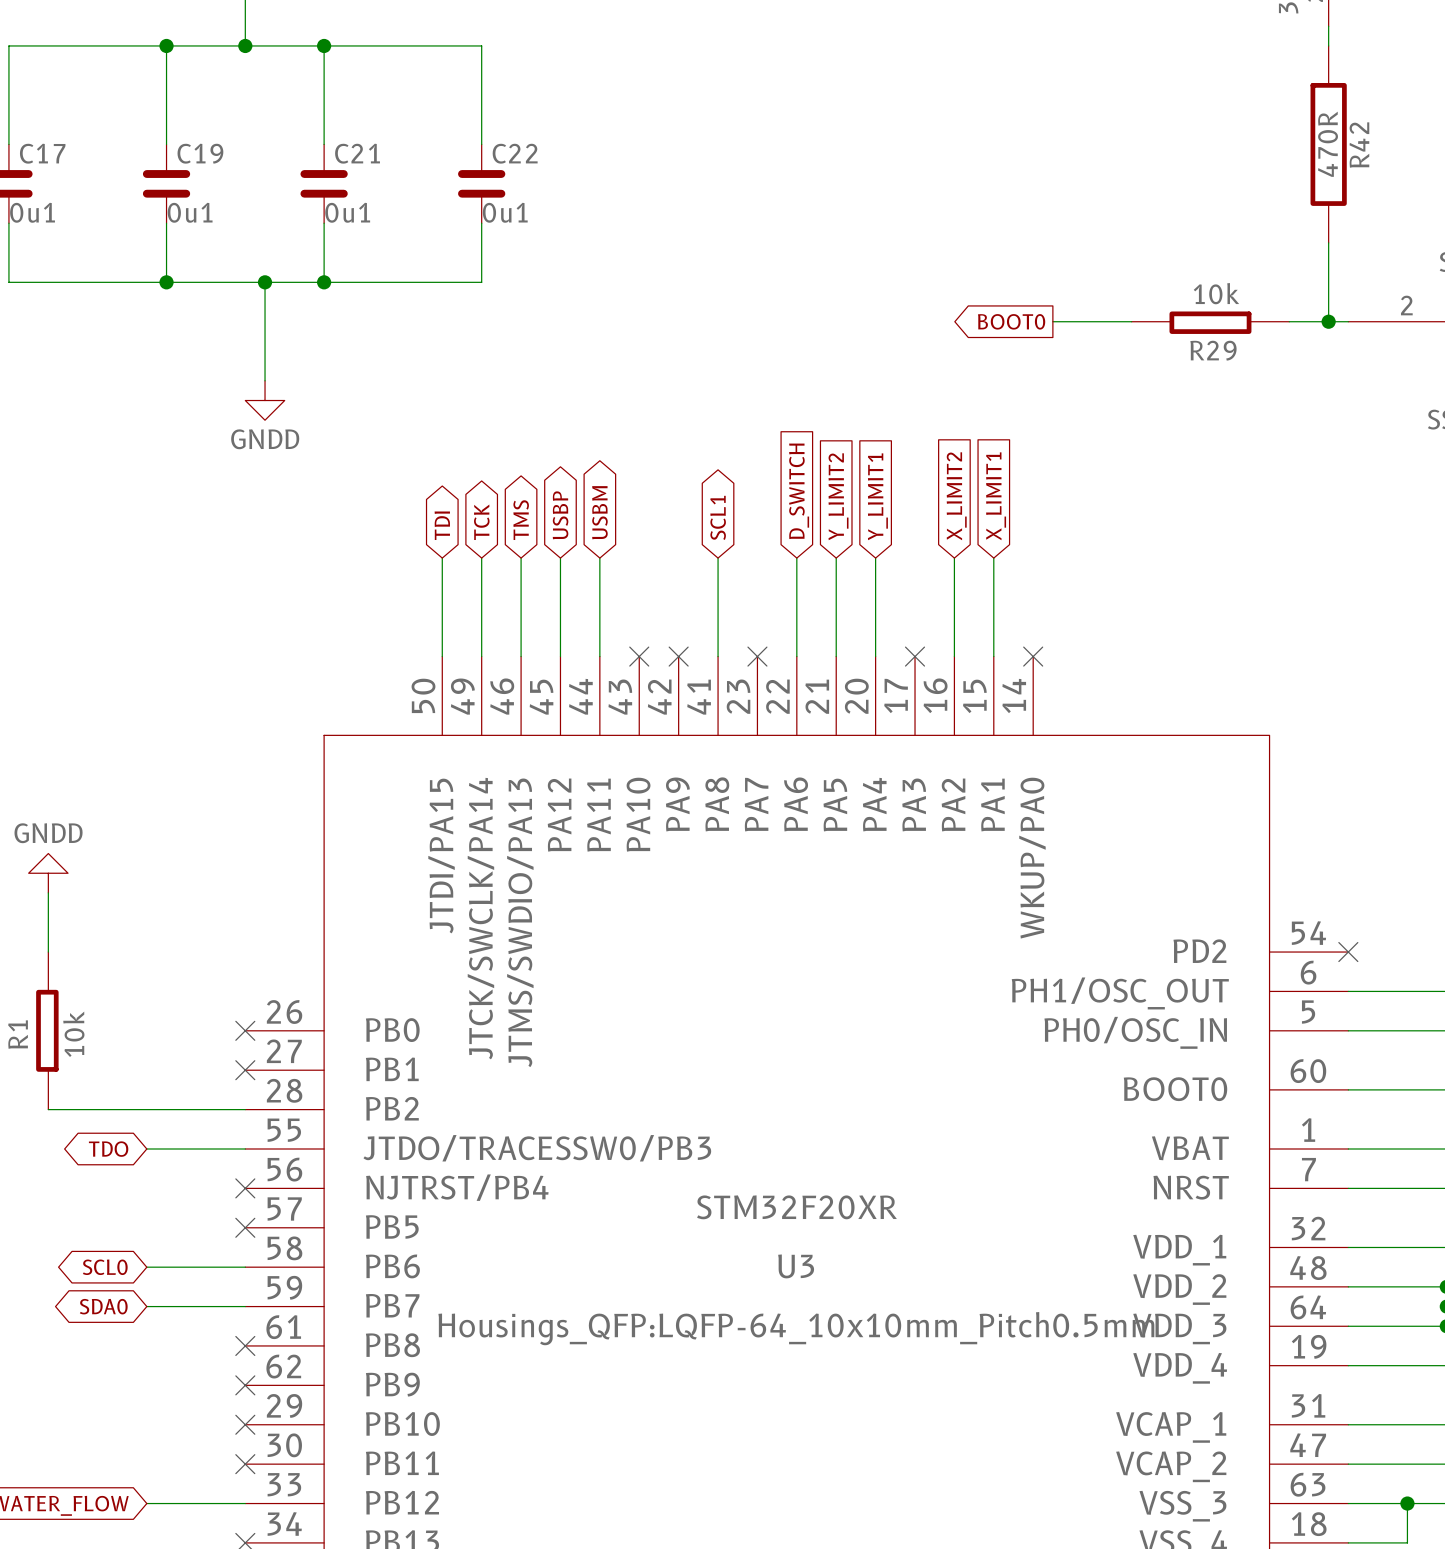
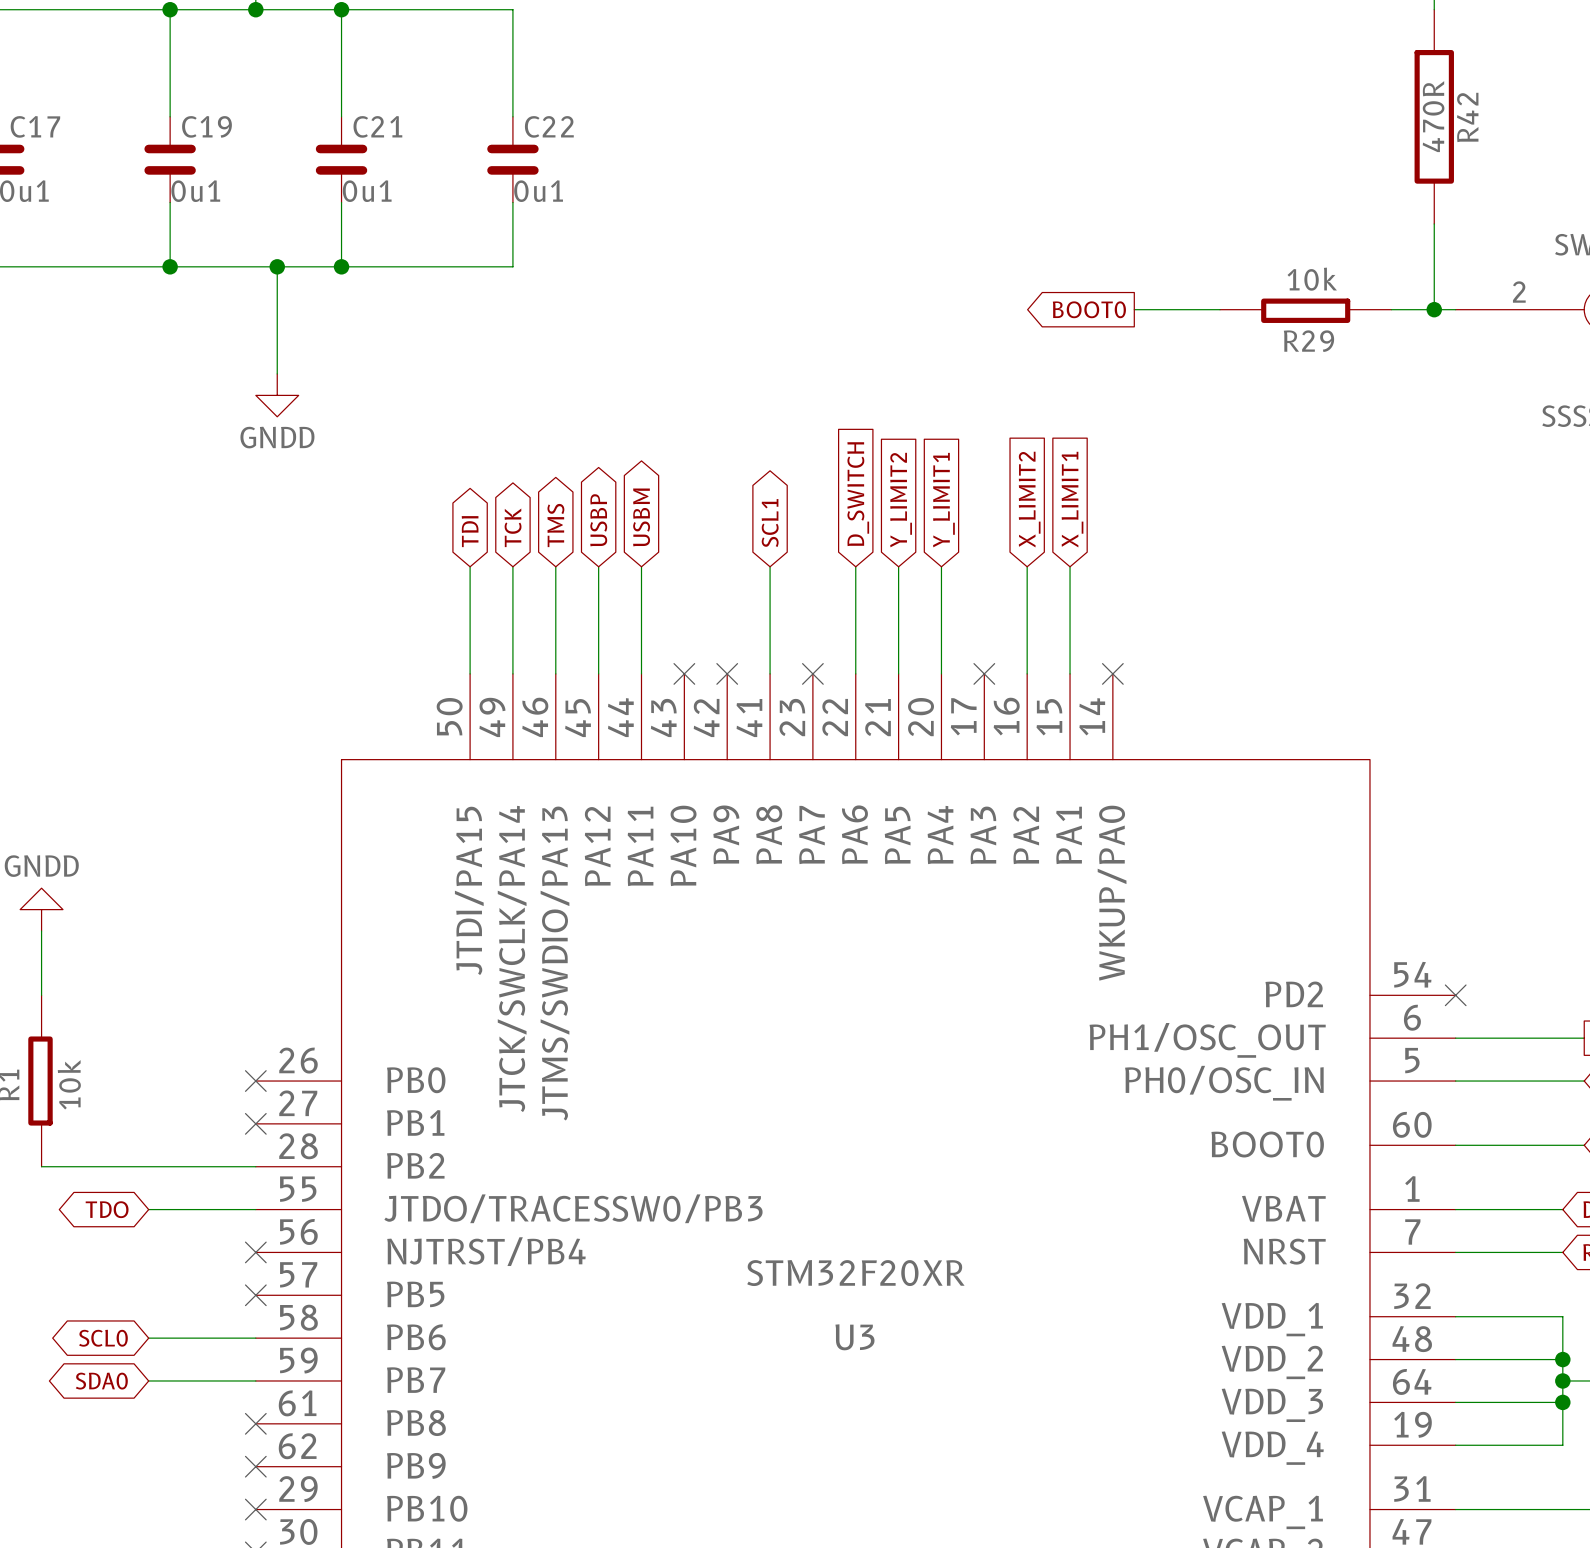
U3 text: Housings_QFP:LQFP-64_10x10mm_Pitch0.5mm (796, 1328) -> none

